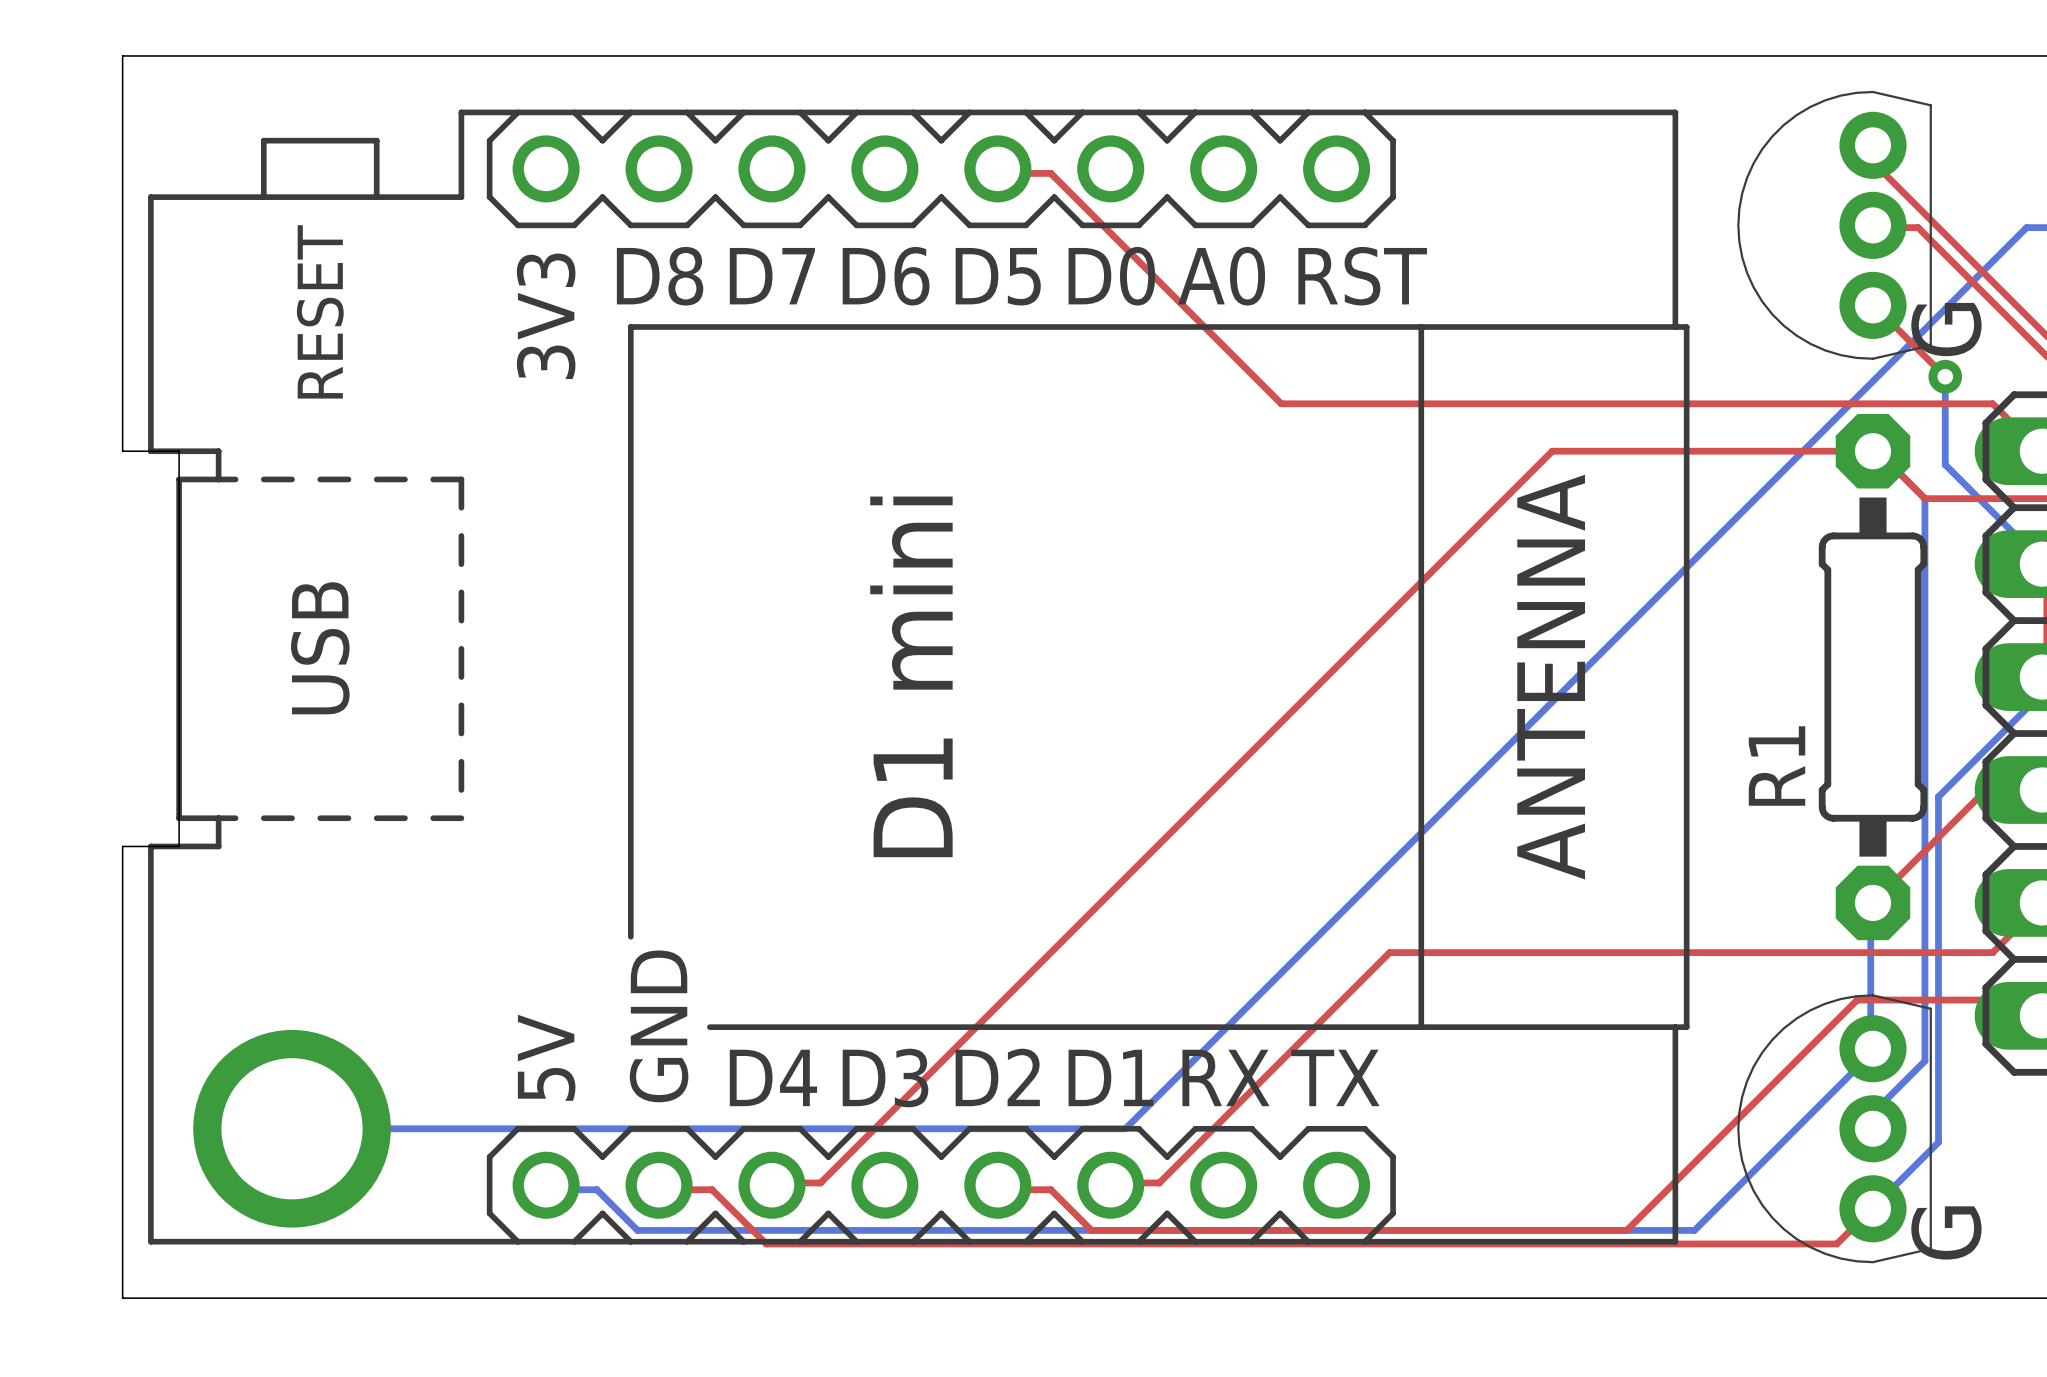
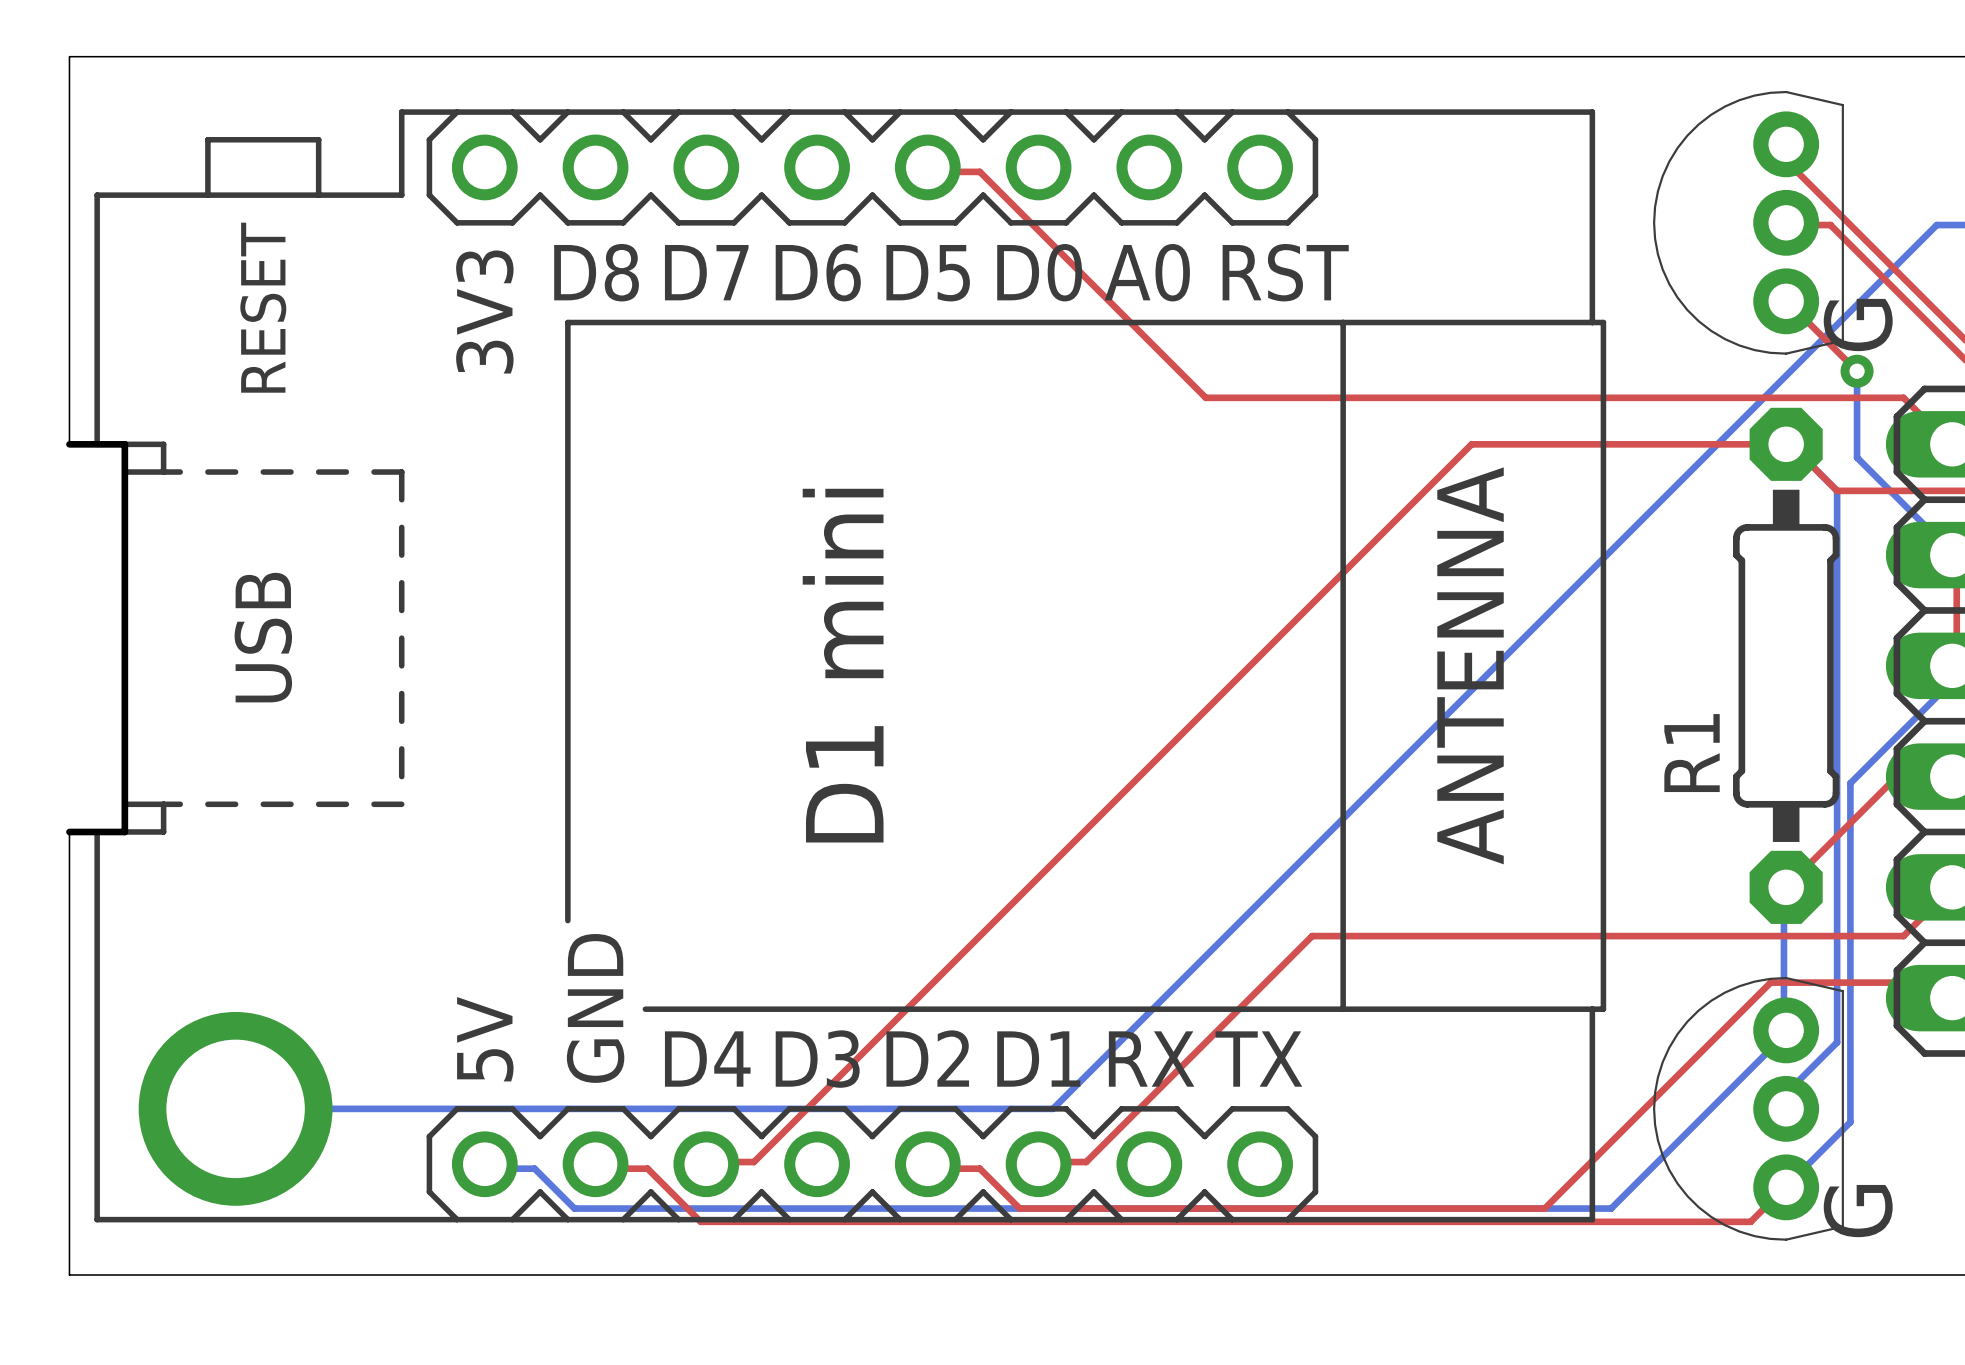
board edge width: thin (122, 451) (179, 451) (179, 846) (122, 846) -> thick (69, 444) (124, 444) (124, 831) (69, 831)

